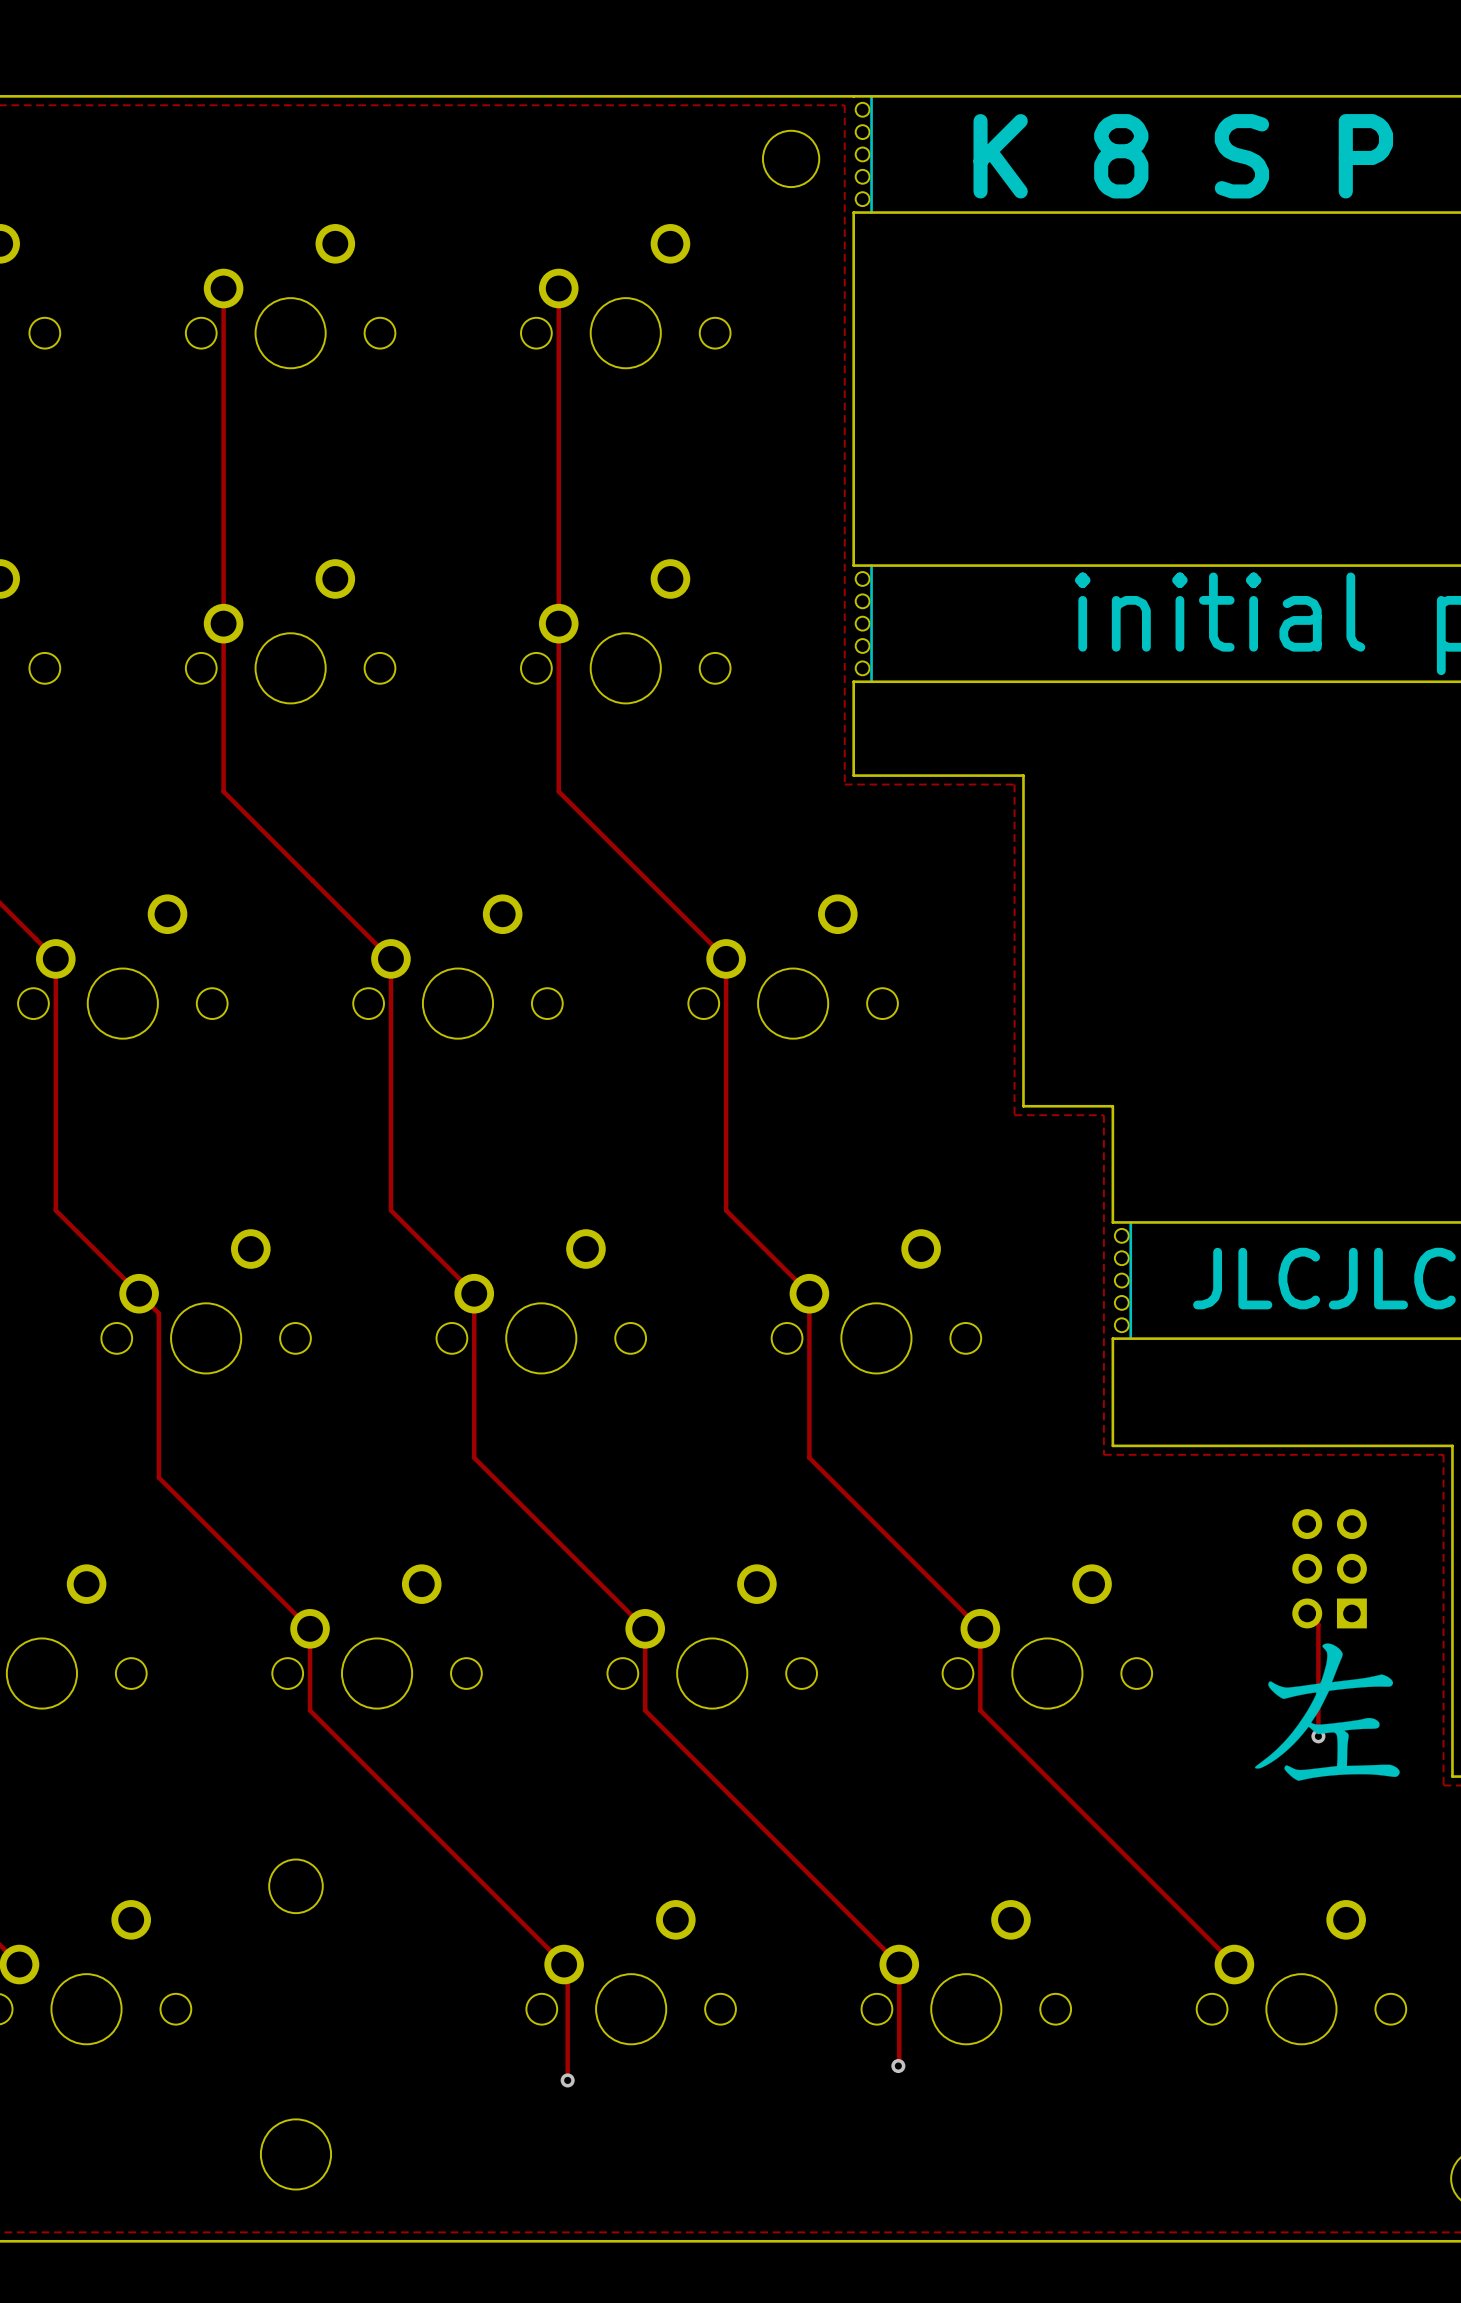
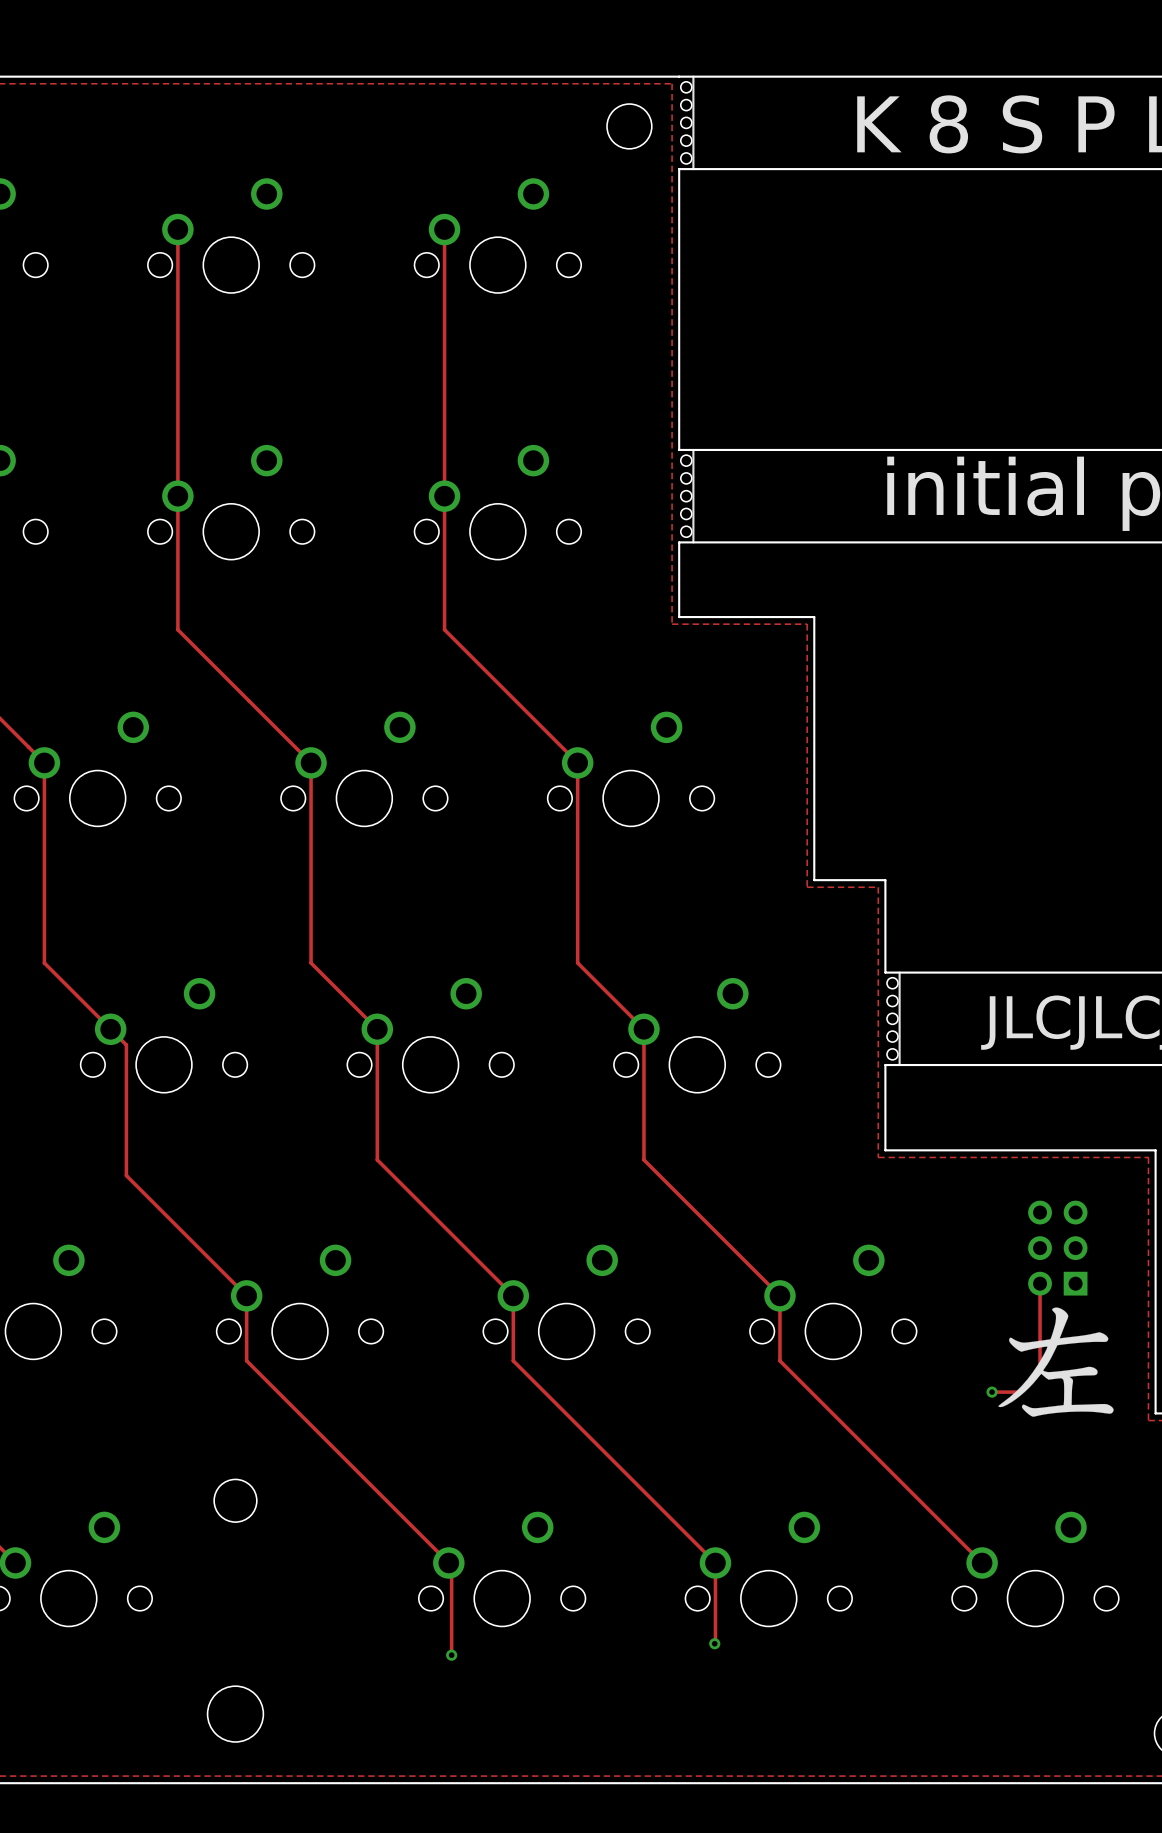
track: (1307, 1613) (1318, 1624) (1318, 1736) -> (1040, 1283) (1040, 1372) (1020, 1392) (992, 1392)
via position: (1318, 1736) -> (992, 1392)

